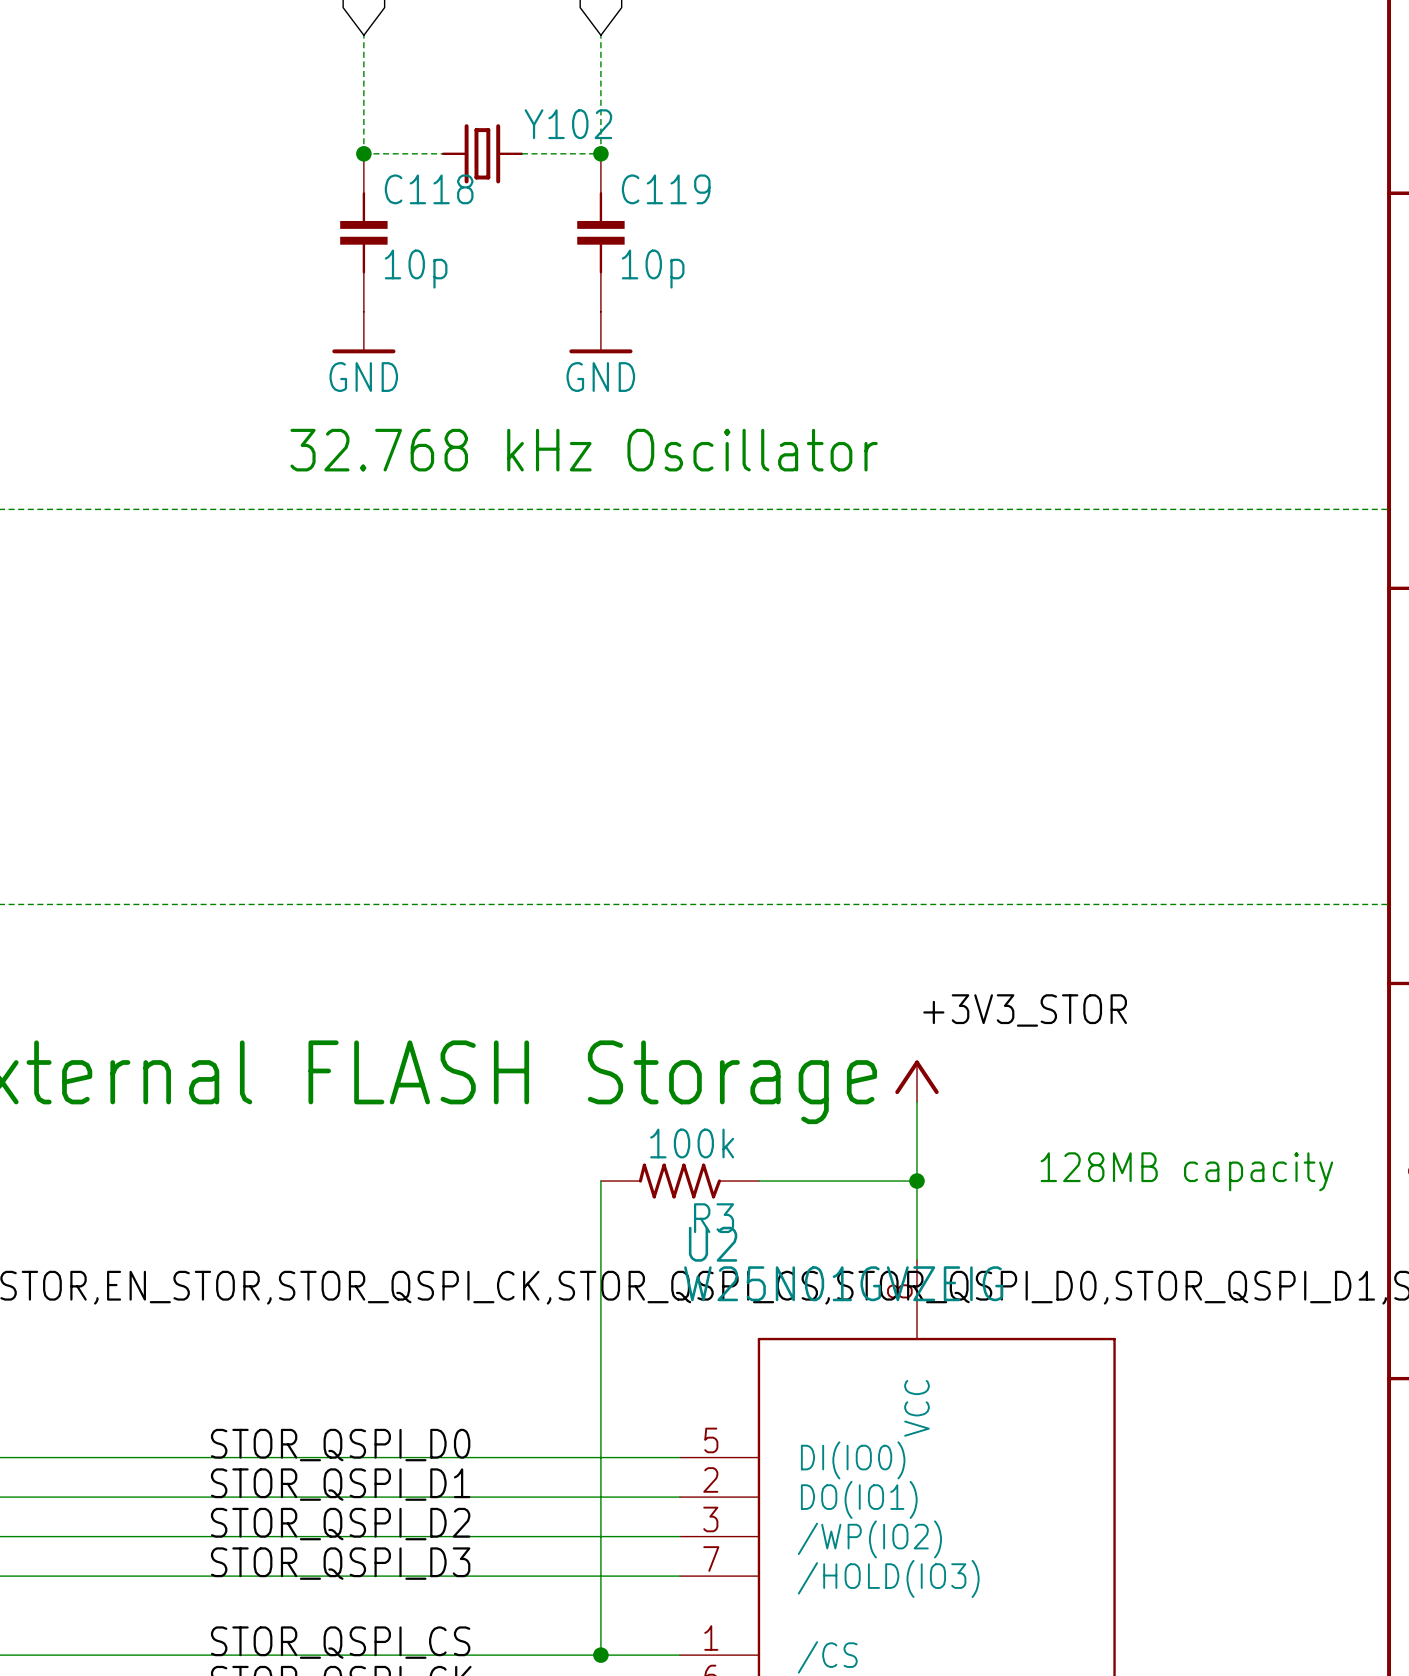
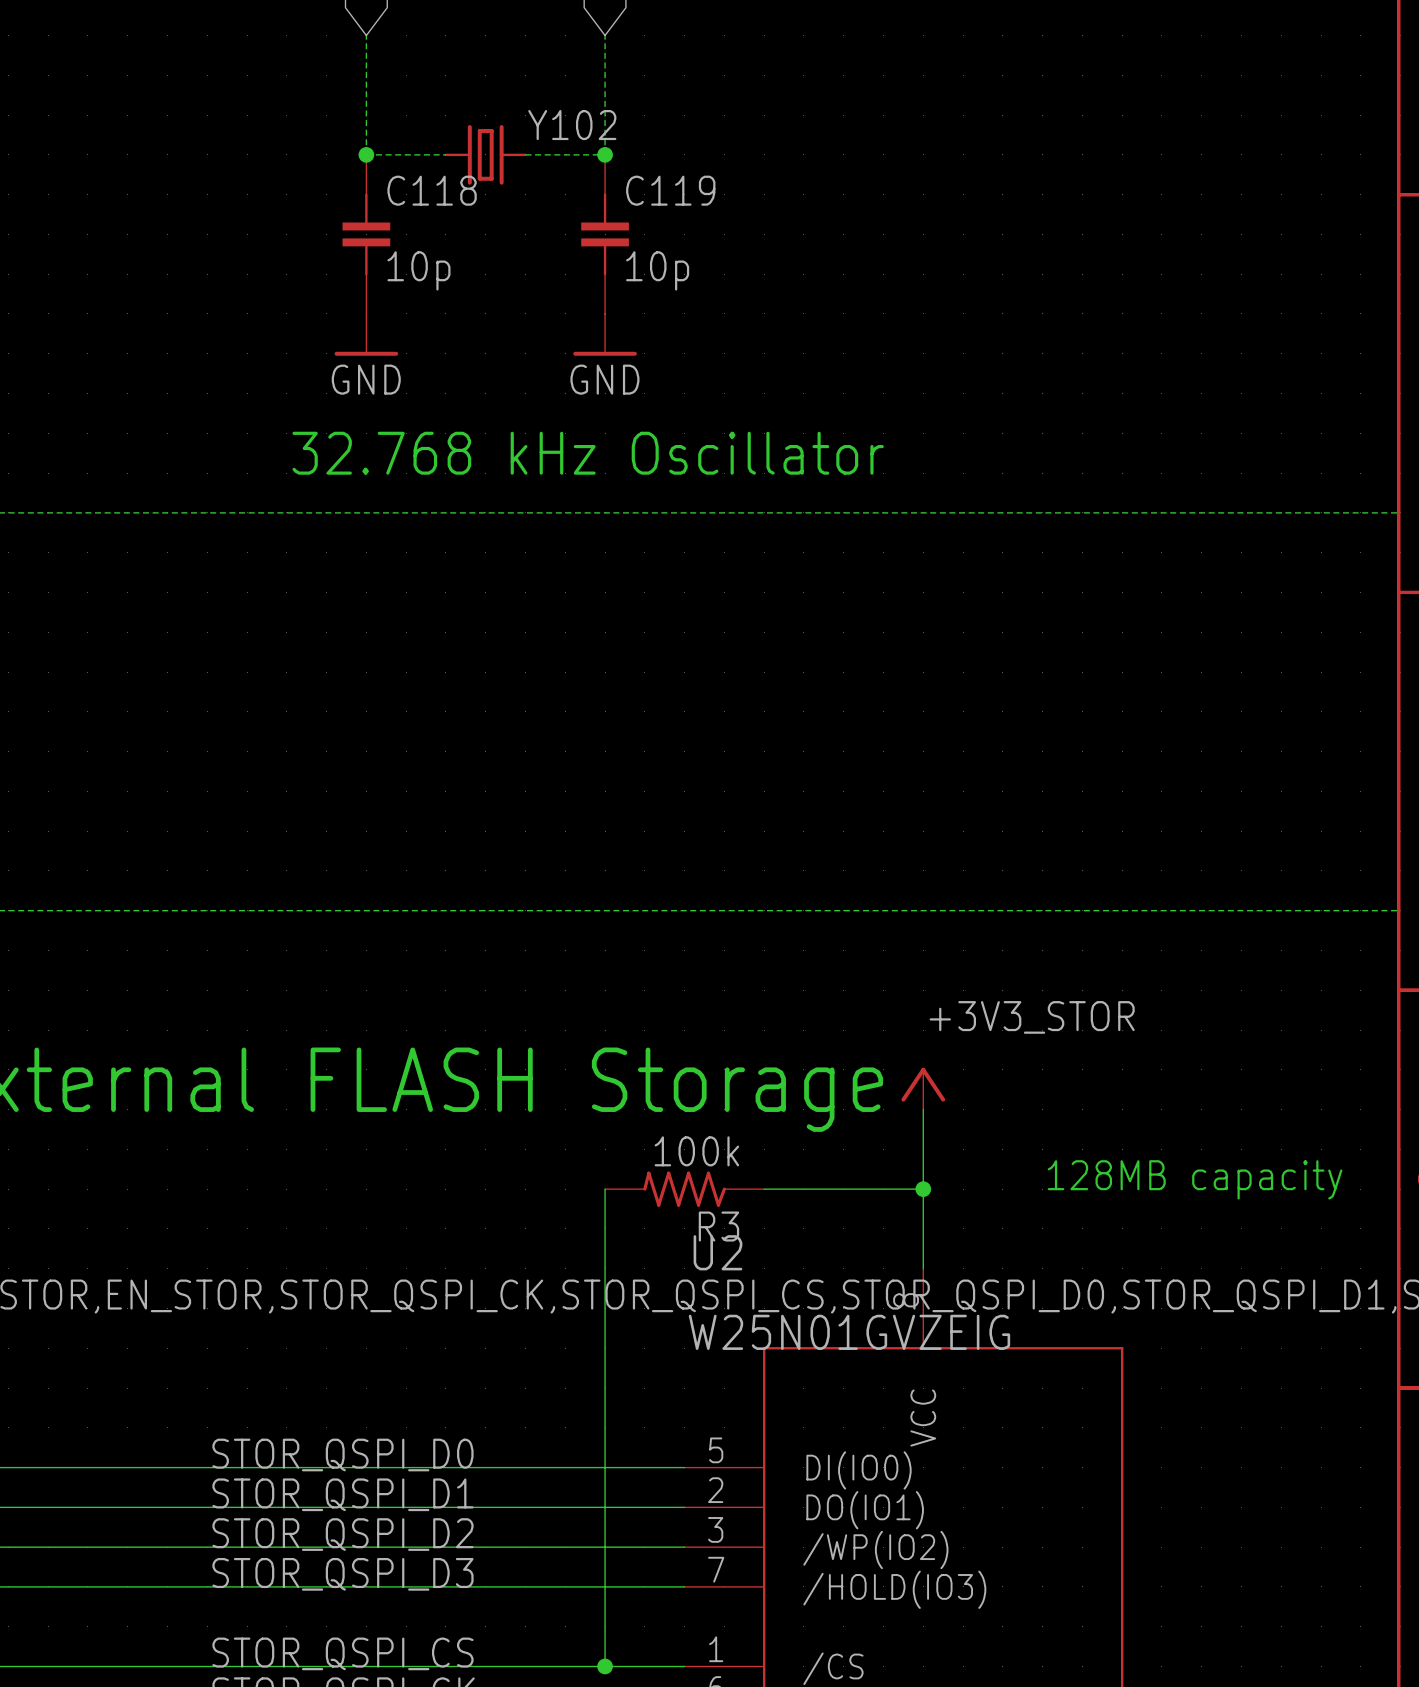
U2 value position: W25N01GVZEIG (843, 1283) -> W25N01GVZEIG (849, 1332)

